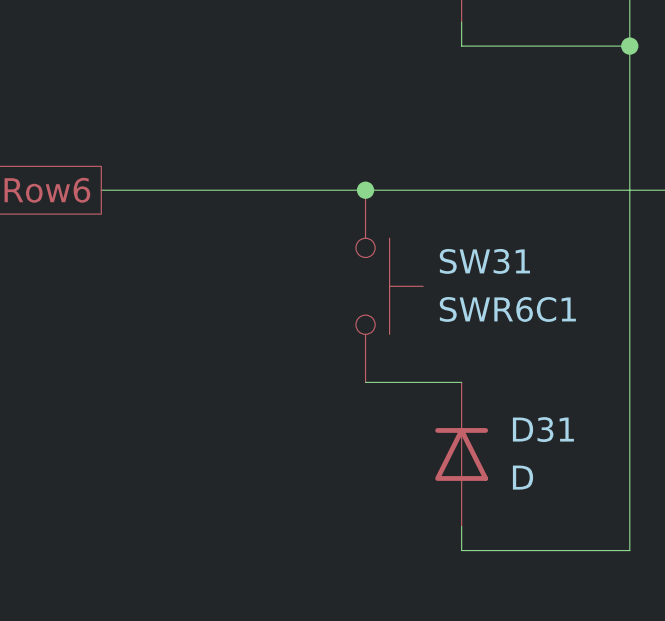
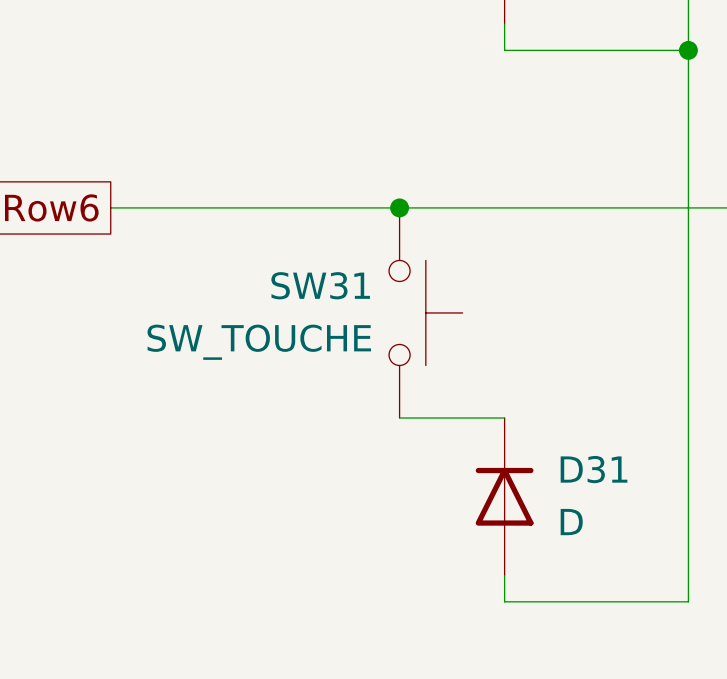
SW31 name position: SW31 (484, 261) -> SW31 (320, 285)
SW31 value: SWR6C1 (507, 309) -> SW_TOUCHE (259, 342)

